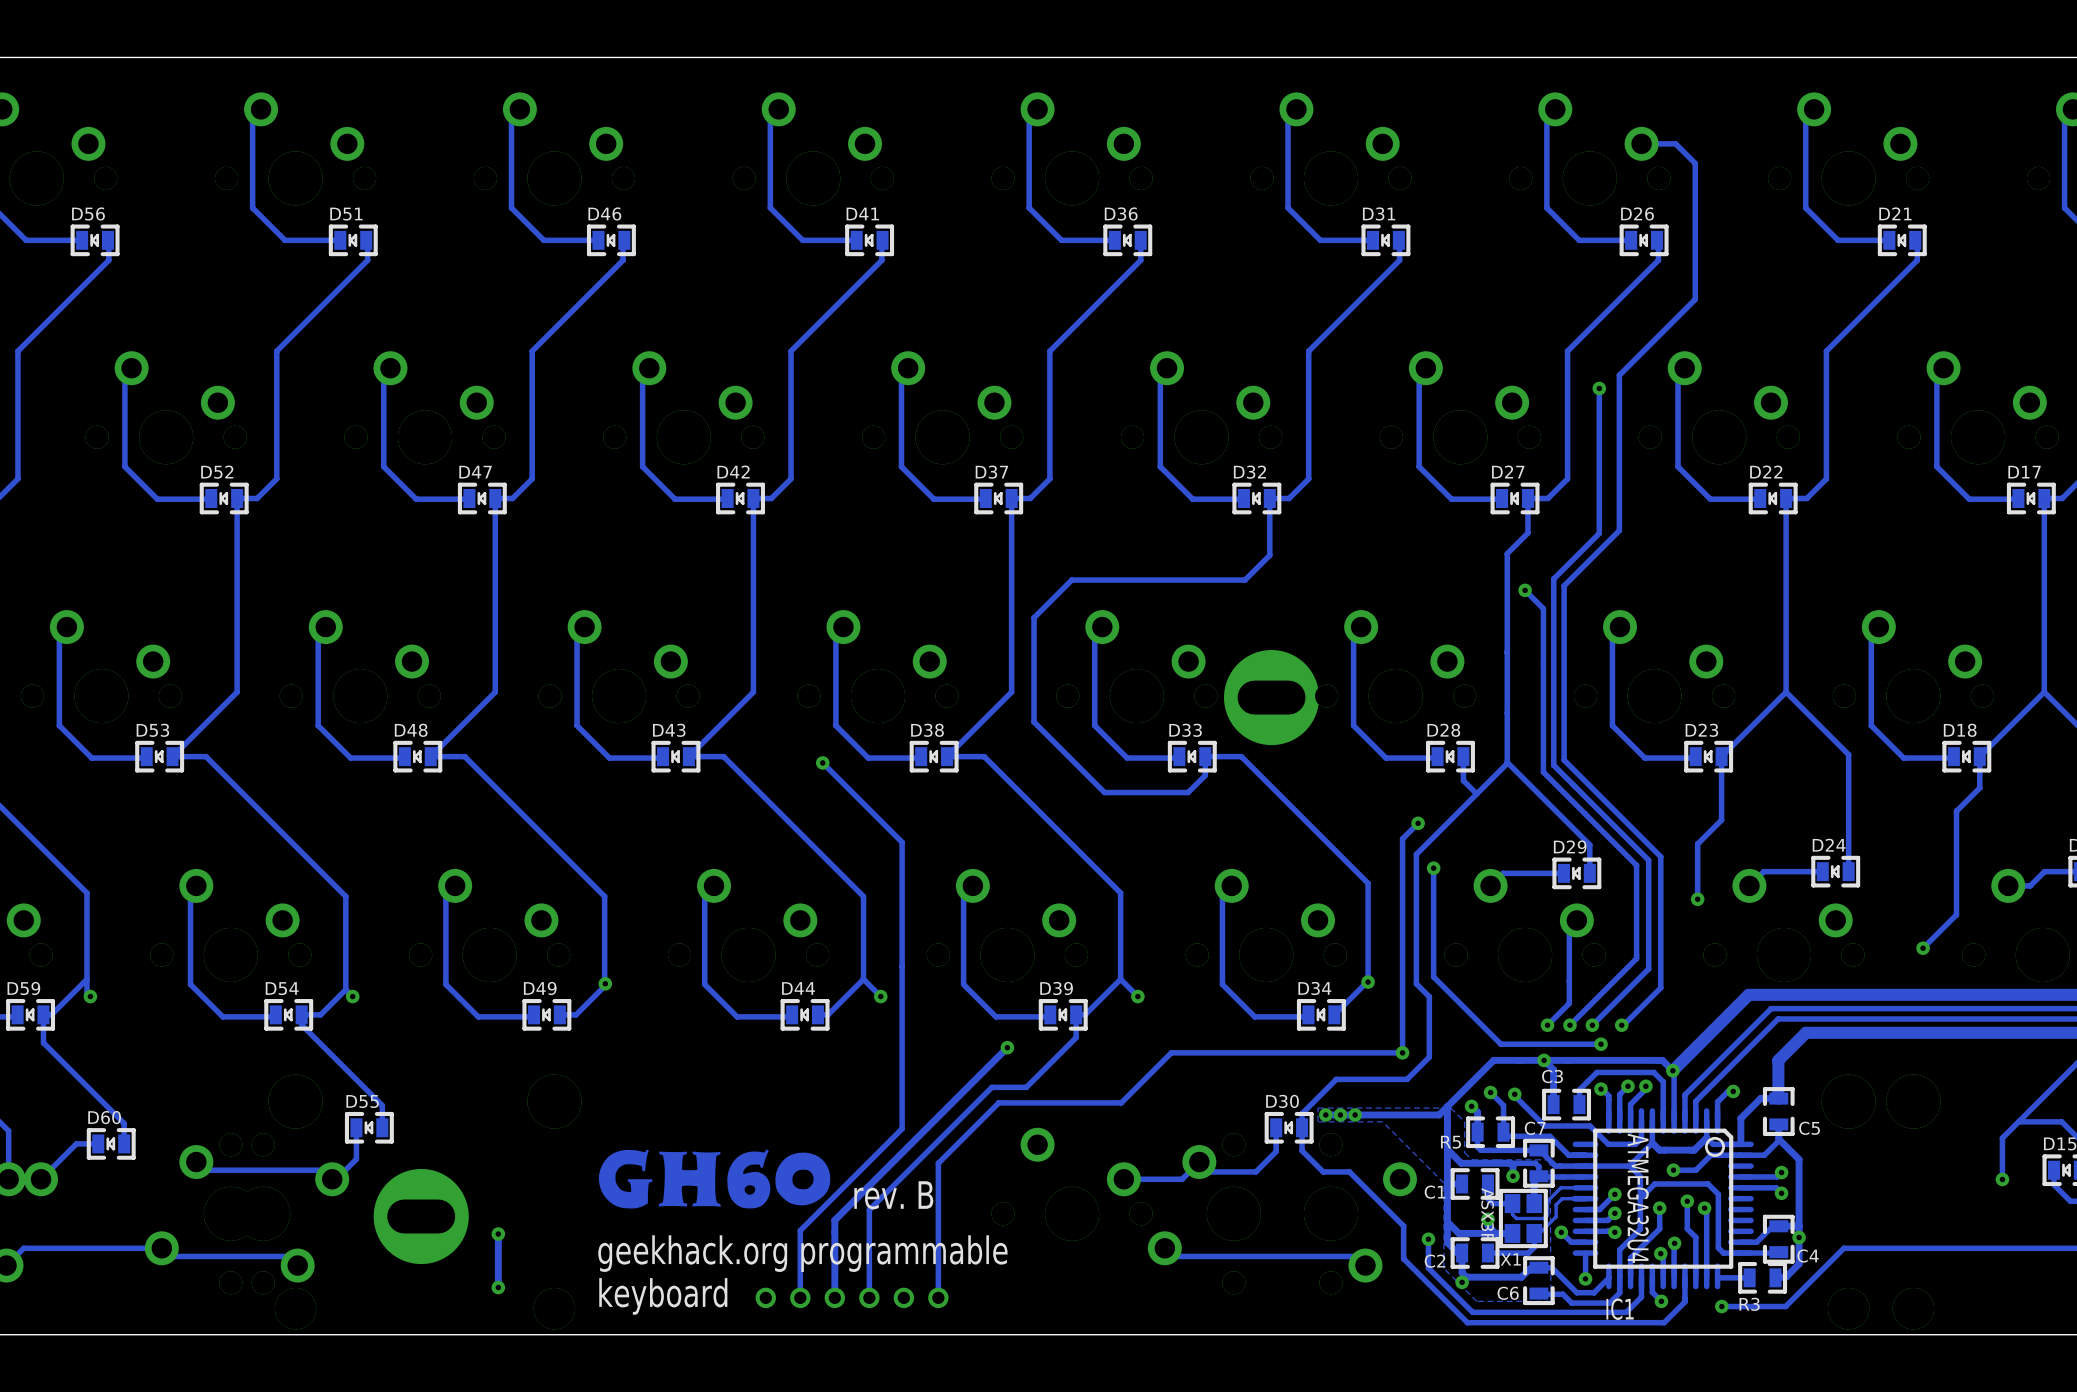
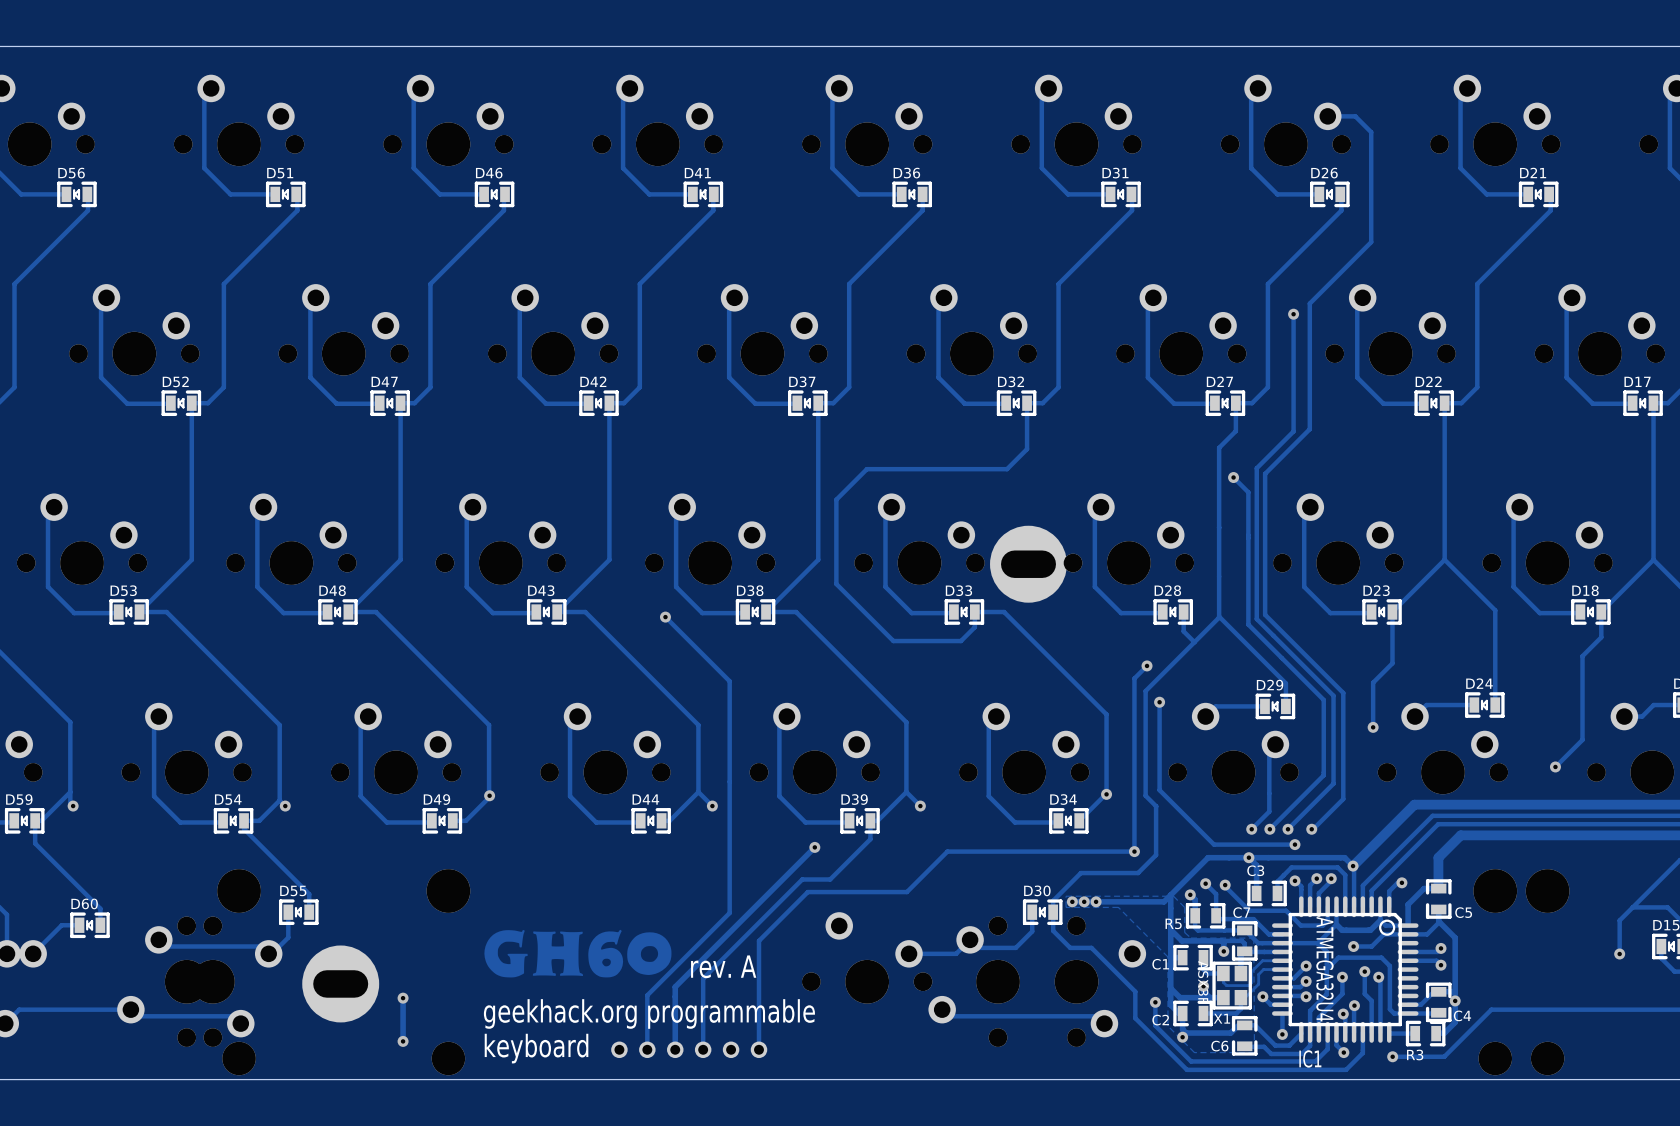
text: rev. B (893, 1195) -> rev. A (723, 966)

